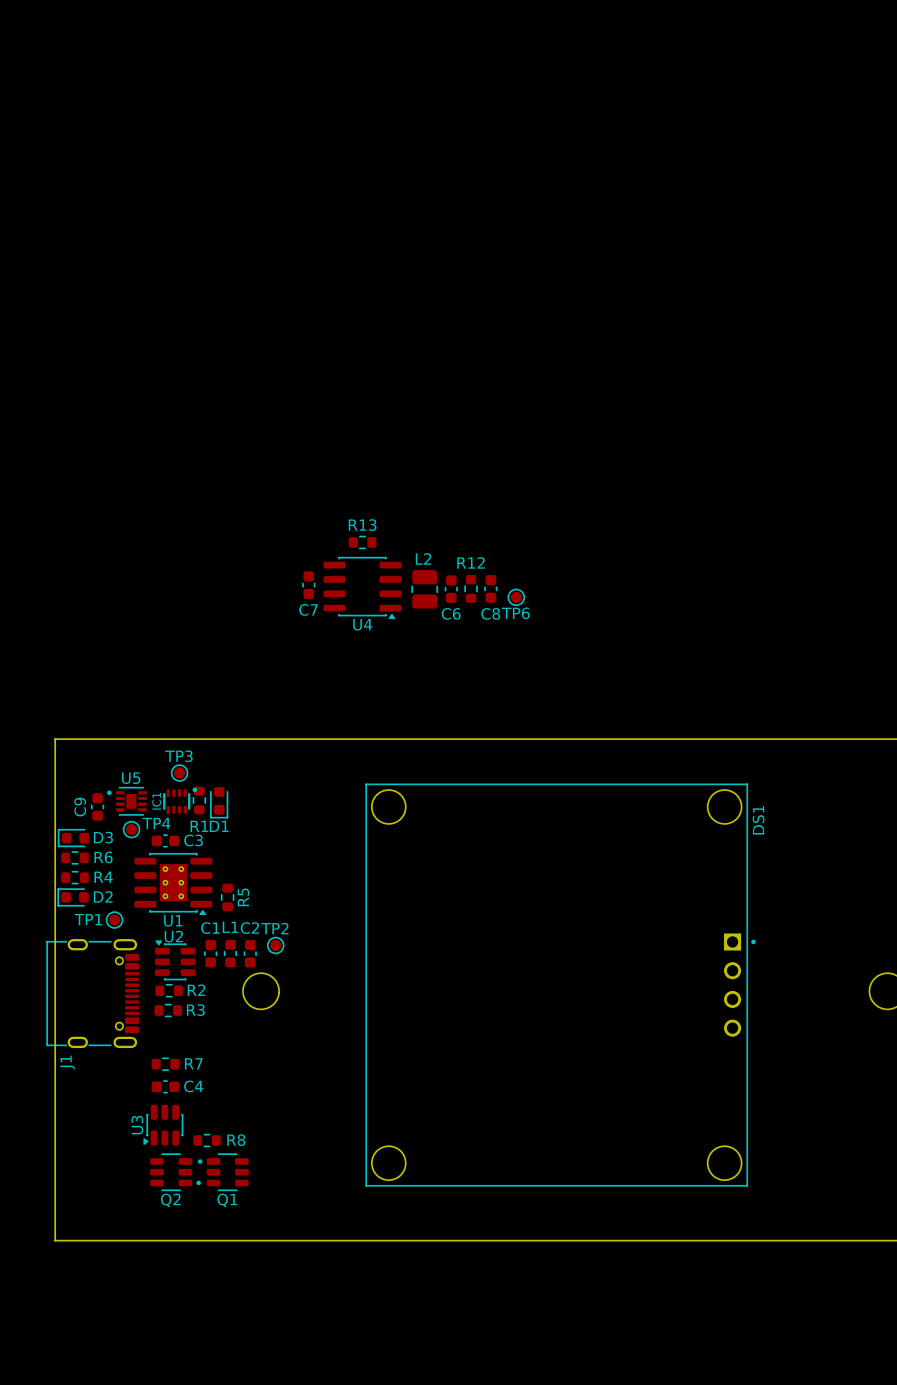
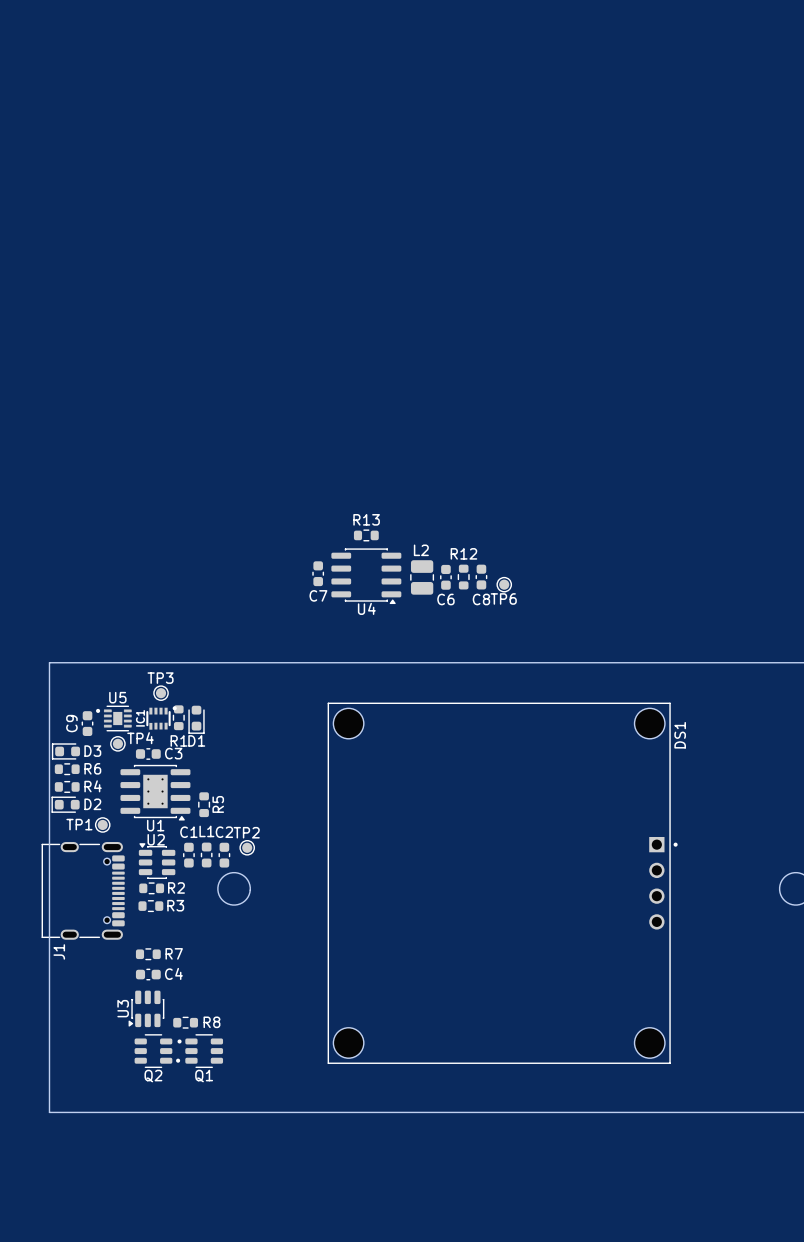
R13 position: (362, 542) -> (366, 535)
C7 position: (308, 585) -> (318, 573)
U4 position: (362, 587) -> (366, 576)
R12 position: (471, 588) -> (463, 577)
C8 position: (490, 588) -> (481, 577)
L2 position: (424, 589) -> (422, 577)
C6 position: (451, 589) -> (445, 577)
TP6 position: (516, 597) -> (504, 584)

